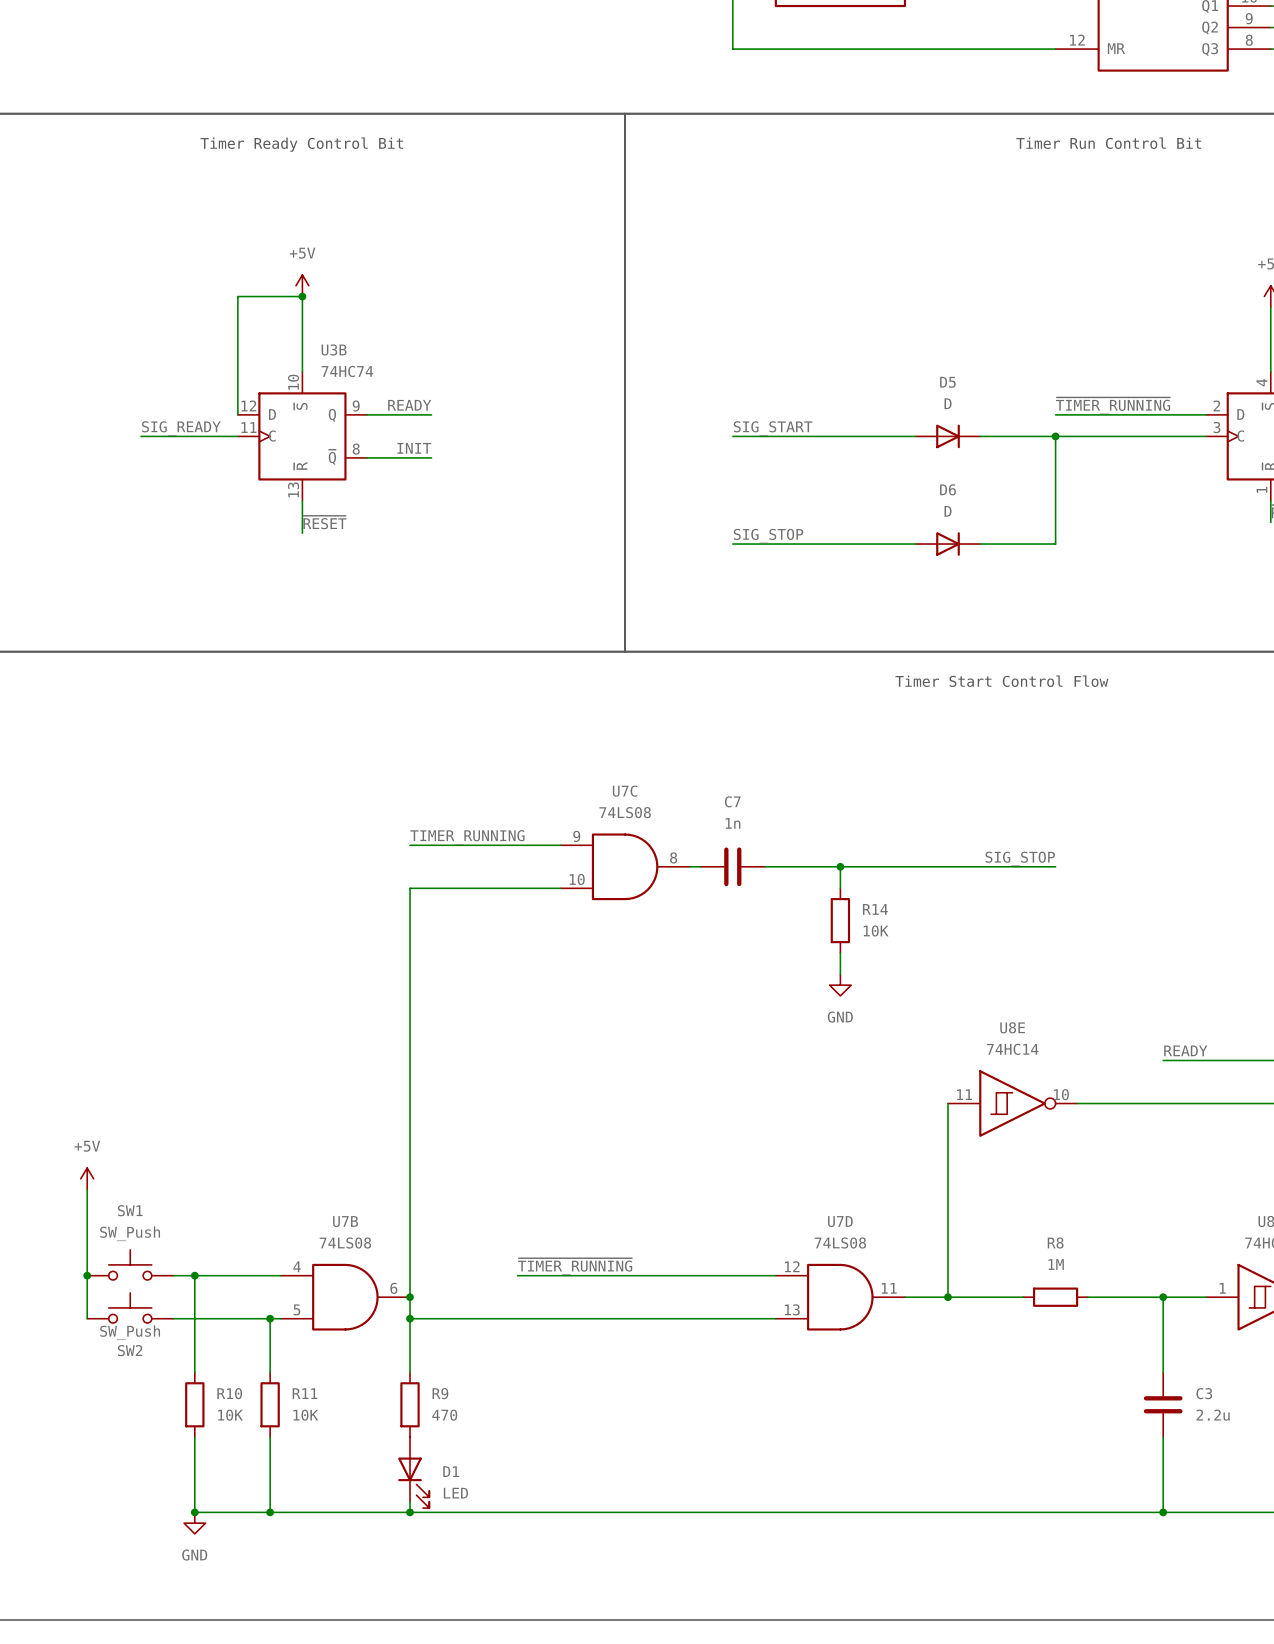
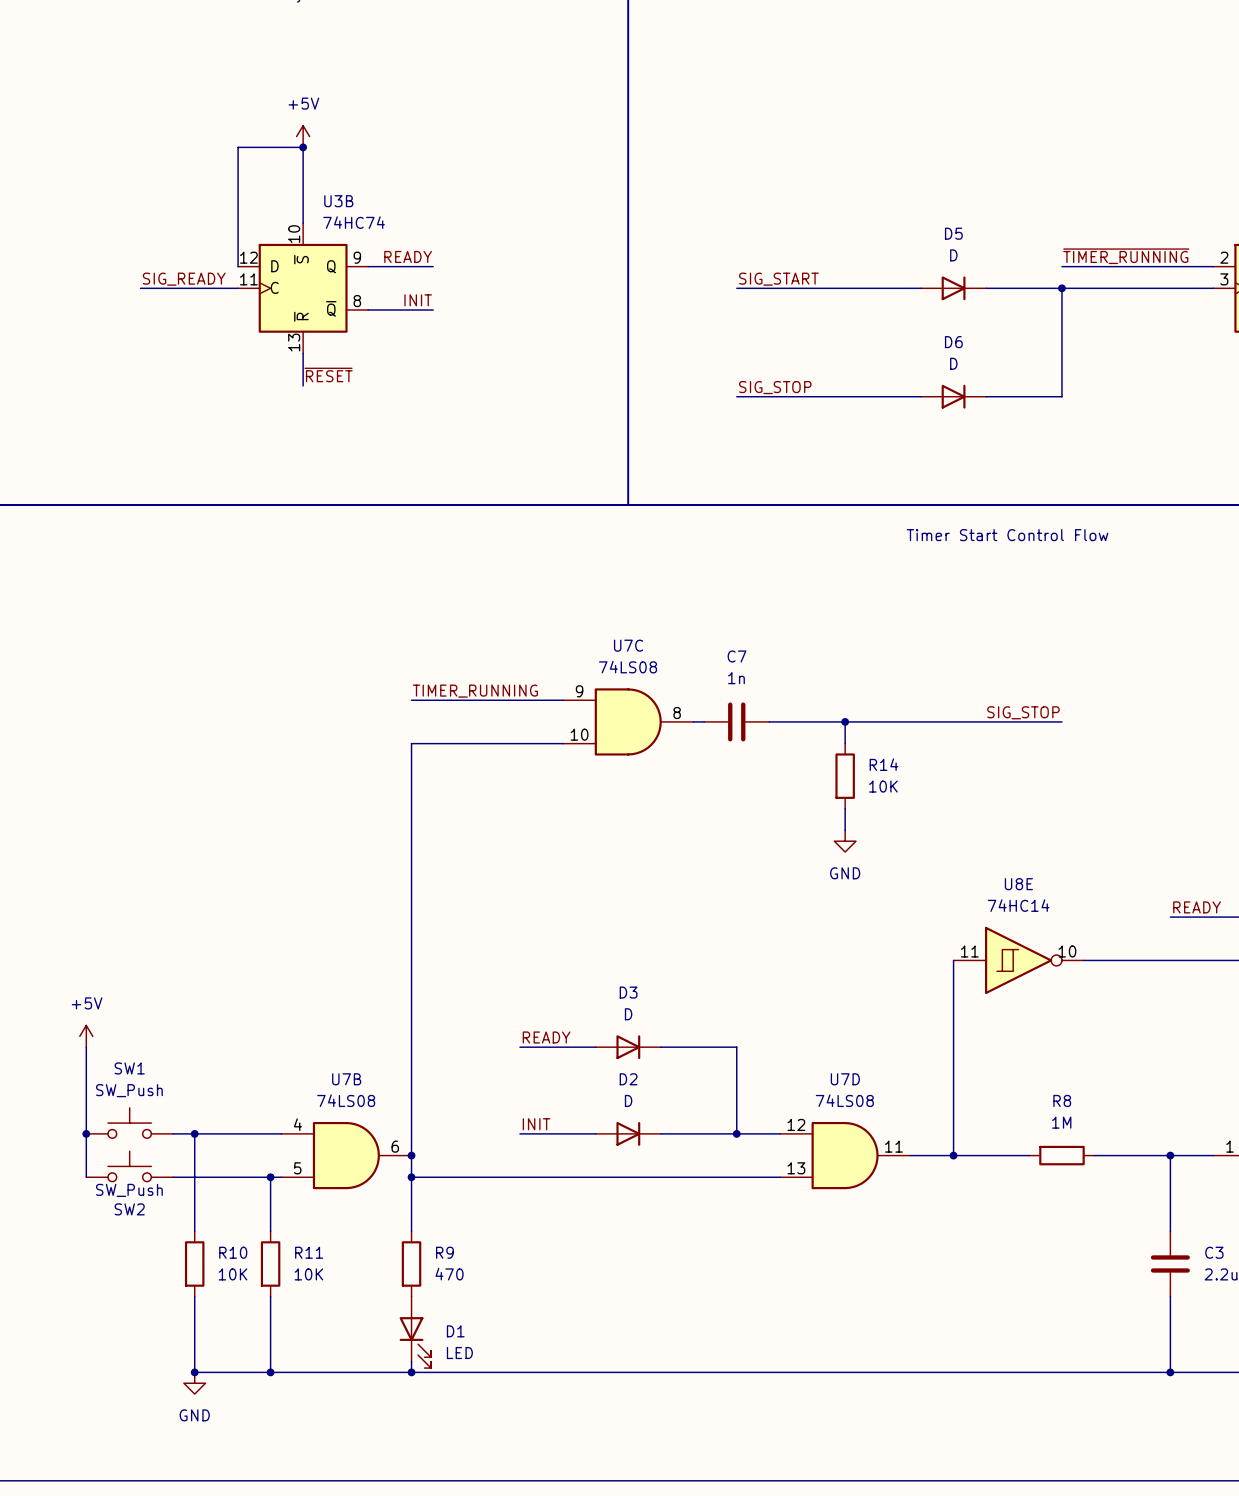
label: none -> READY (546, 1037)
wire: none -> (519, 1047) (595, 1047)
D3: none -> D (628, 1047)
wire: none -> (660, 1047) (736, 1047) (736, 1133)
label: ~{TIMER_RUNNING} (575, 1266) -> INIT (536, 1124)
D2: none -> D (628, 1133)
junction: none -> (736, 1133)

